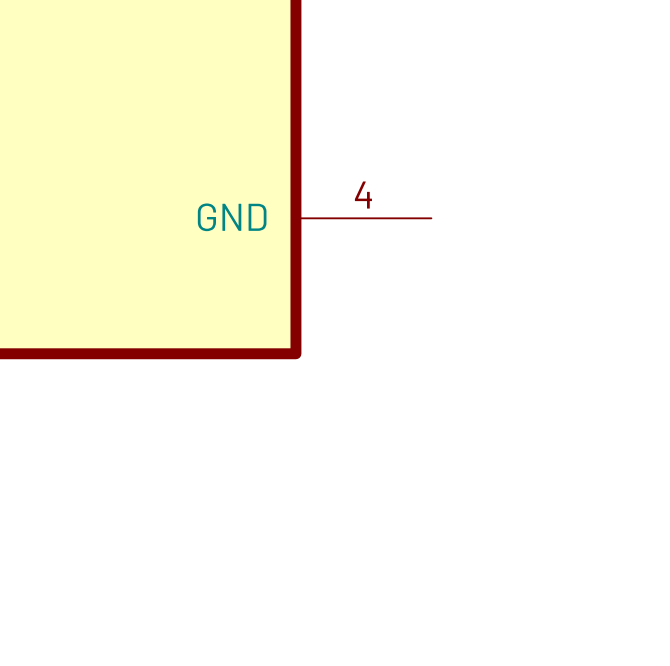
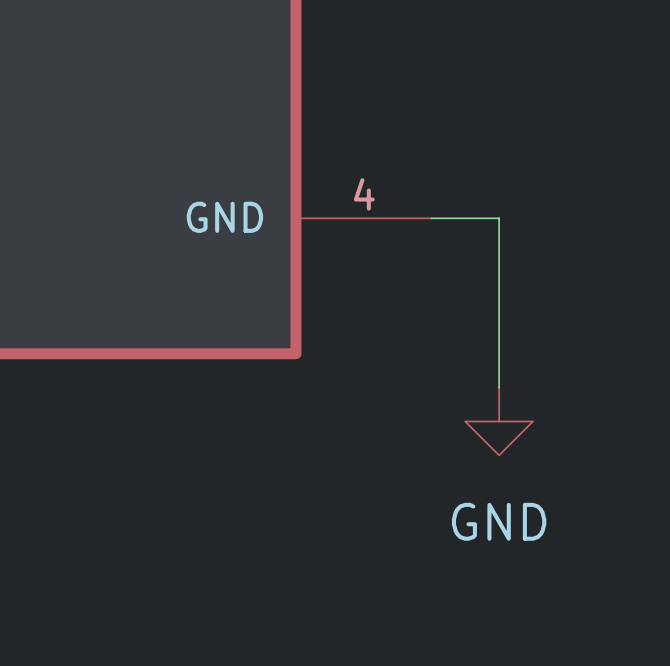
wire: none -> (431, 218) (499, 218) (499, 387)
power symbol: none -> GND (499, 421)

